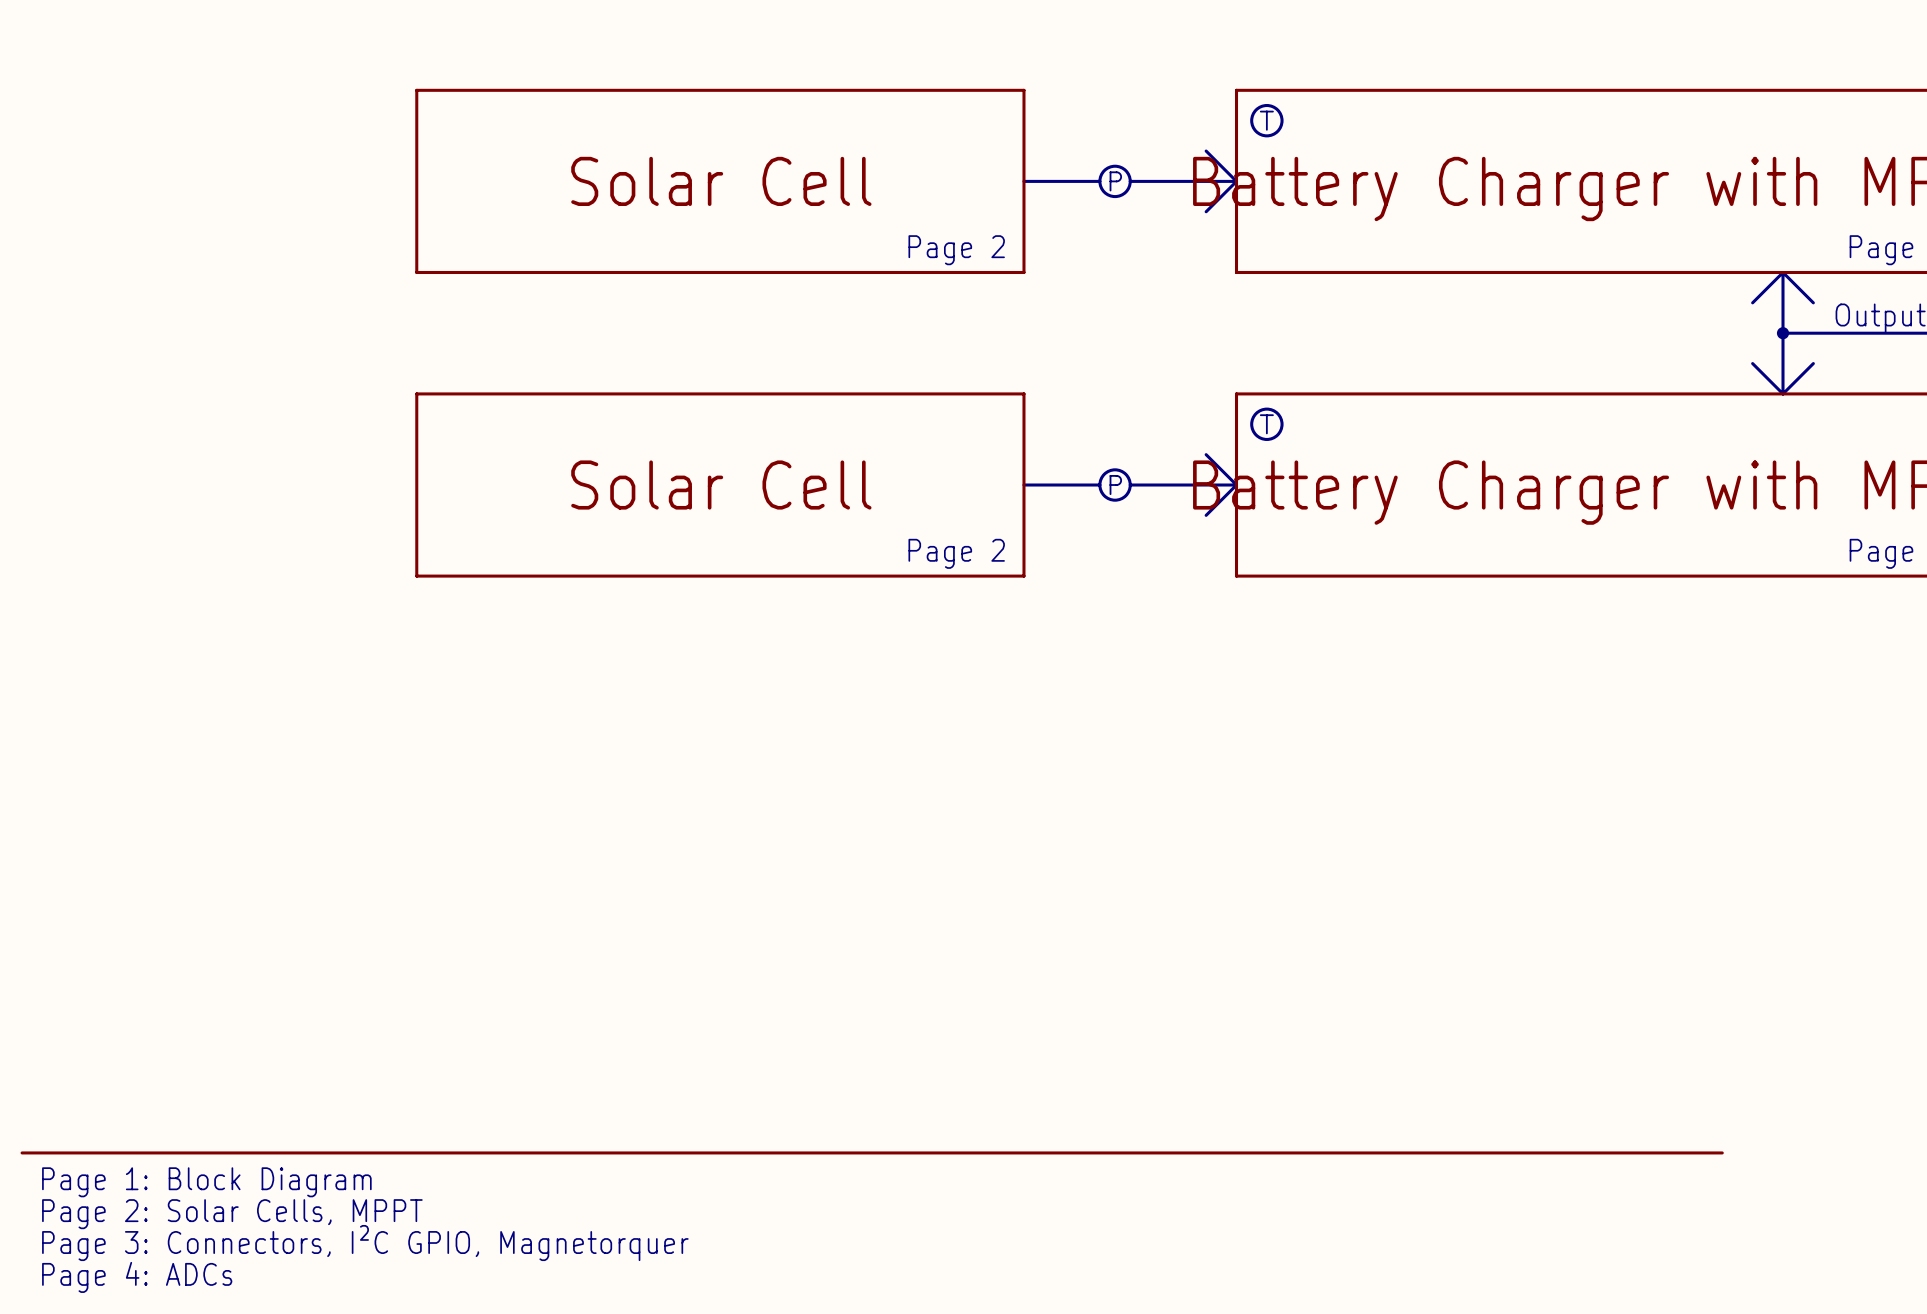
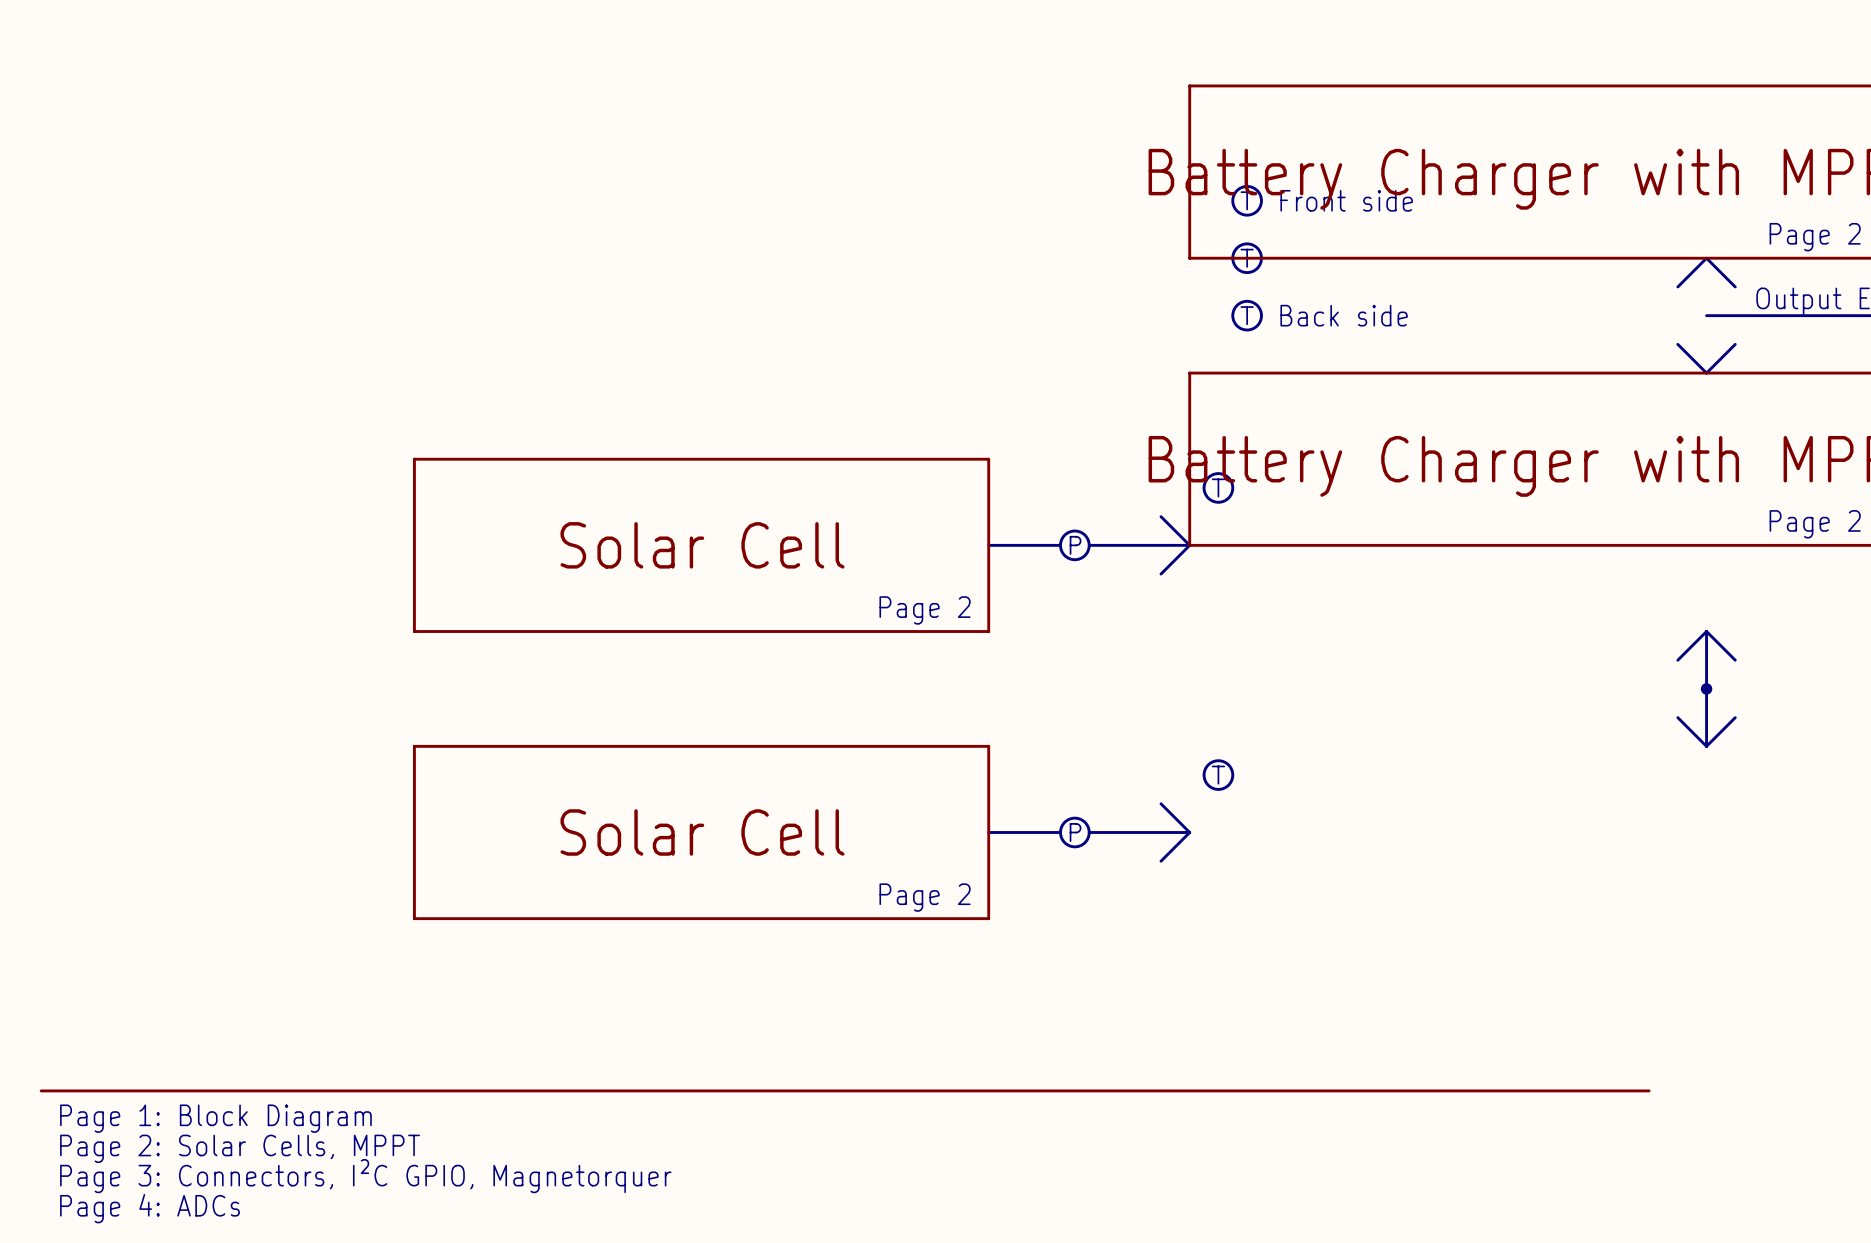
line: (416, 90) (1023, 90) (1023, 272) (416, 272) (416, 90) -> none
part: (1266, 120) -> none
line: (1206, 151) (1236, 181) -> none
text: Solar Cell (721, 181) -> none
line: (1023, 181) (1099, 181) -> none
part: (1115, 181) -> none
line: (1130, 181) (1236, 181) -> none
line: (1236, 181) (1206, 211) -> none
part: none -> (1247, 200)
text: none -> Front side (1346, 200)
text: Page 2 (956, 250) -> none
part: none -> (1247, 258)
line: (1783, 272) (1783, 393) -> none
part: none -> (1247, 315)
text: none -> Back side (1344, 315)
part: (1783, 333) -> none
part: (1266, 424) -> none
line: (1206, 454) (1236, 485) -> (1160, 516) (1189, 545)
line: (416, 485) (416, 393) (1023, 393) (1023, 485) -> (414, 459) (988, 459)
text position: Solar Cell (721, 485) -> Solar Cell (702, 545)
line: (1023, 485) (1099, 485) -> (988, 545) (1060, 545)
part position: (1115, 485) -> (1074, 545)
line: (1130, 485) (1236, 485) -> (1089, 545) (1189, 545)
line: (1236, 485) (1206, 515) -> (1189, 545) (1160, 574)
part: none -> (1218, 487)
text position: Page 2 (956, 553) -> Page 2 (925, 610)
line: (416, 576) (1023, 576) -> (414, 545) (414, 631) (988, 631) (988, 545)
line: none -> (1706, 631) (1706, 746)
line: none -> (1706, 631) (1677, 660)
line: none -> (1706, 631) (1735, 660)
part: none -> (1706, 688)
line: none -> (1677, 717) (1706, 746)
line: none -> (1735, 717) (1706, 746)
line: none -> (414, 746) (414, 918) (988, 918) (988, 746) (414, 746)
part: none -> (1218, 775)
line: none -> (1160, 803) (1189, 832)
text: none -> Solar Cell (702, 832)
line: none -> (988, 832) (1060, 832)
part: none -> (1074, 832)
line: none -> (1089, 832) (1189, 832)
line: none -> (1189, 832) (1160, 861)
text: none -> Page 2 (925, 897)

